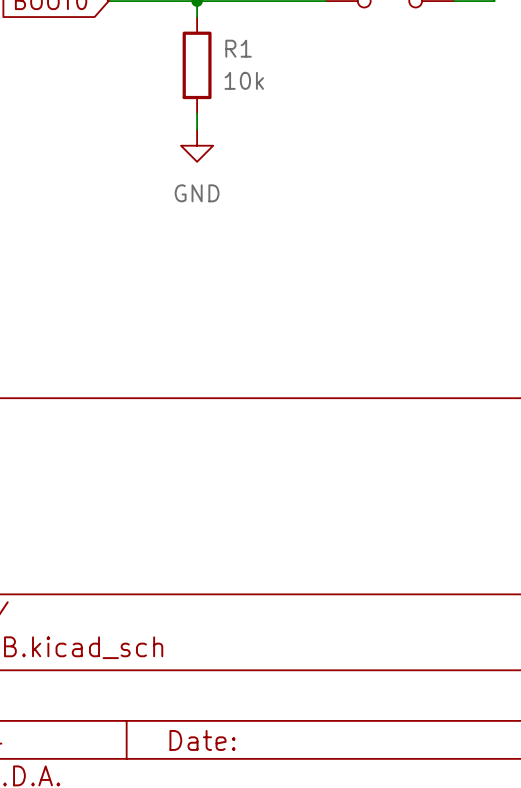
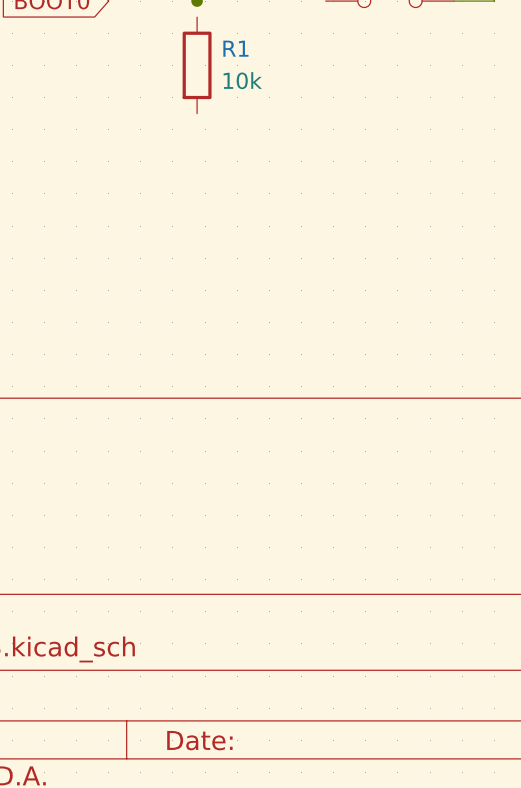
wire: (108, 1) (325, 1) -> none
wire: (197, 1) (197, 17) -> none
wire: (197, 113) (197, 129) -> none
power symbol: GND (197, 145) -> none

